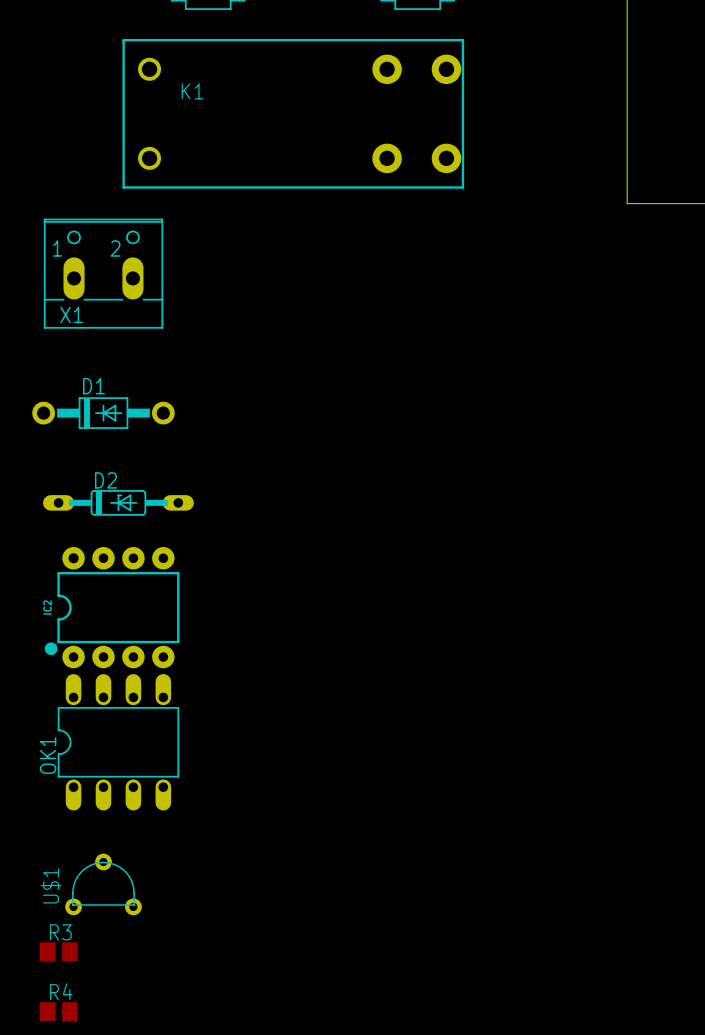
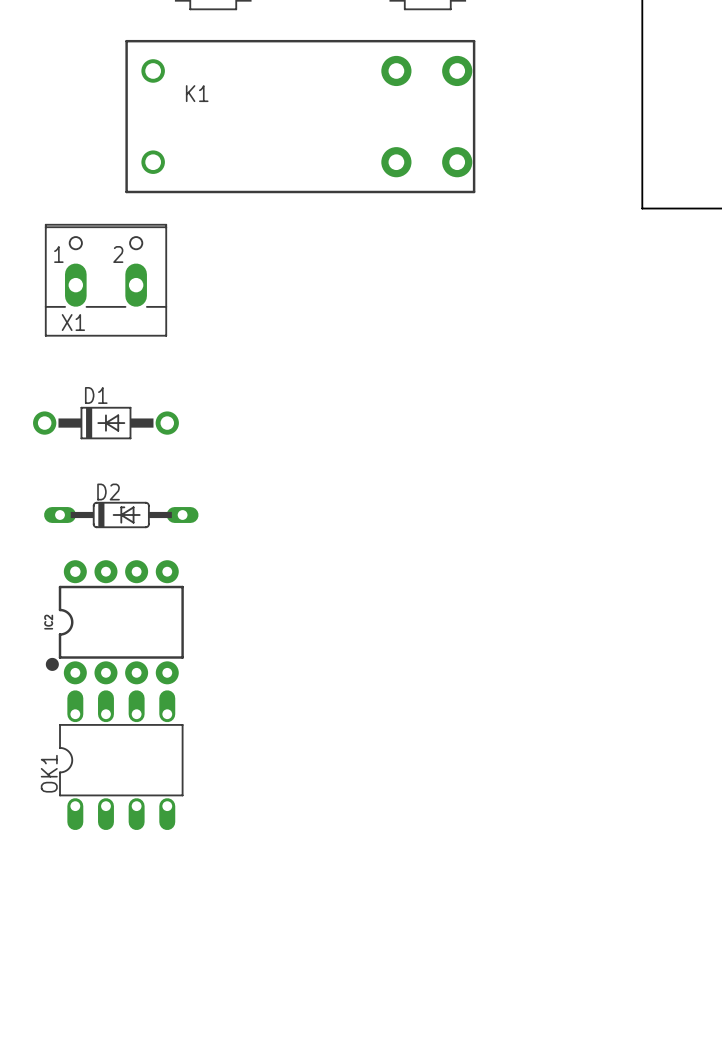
U$1: (103, 884) -> none
R3: (58, 951) -> none
R4: (58, 1011) -> none

